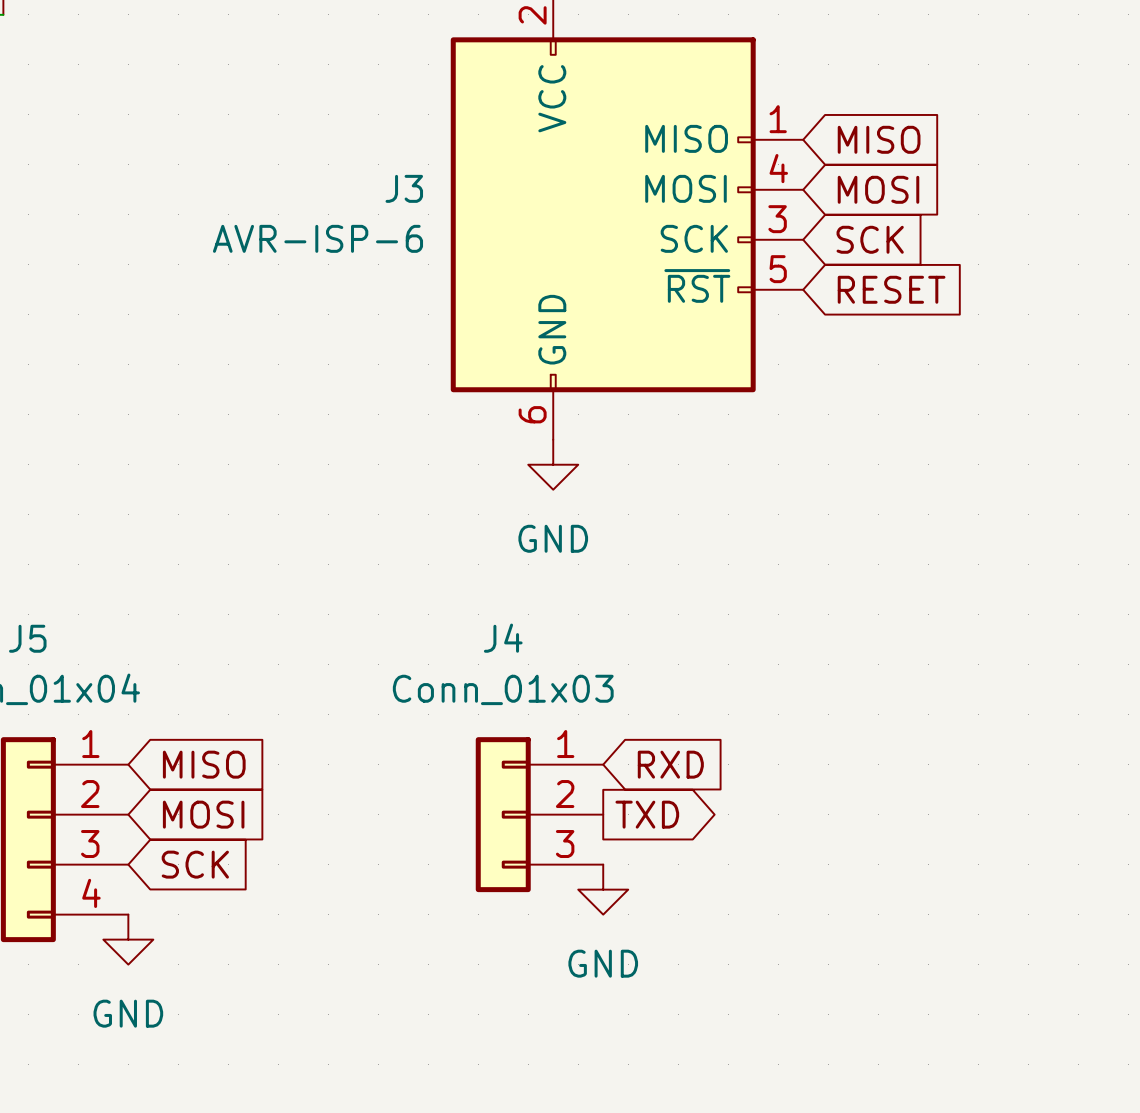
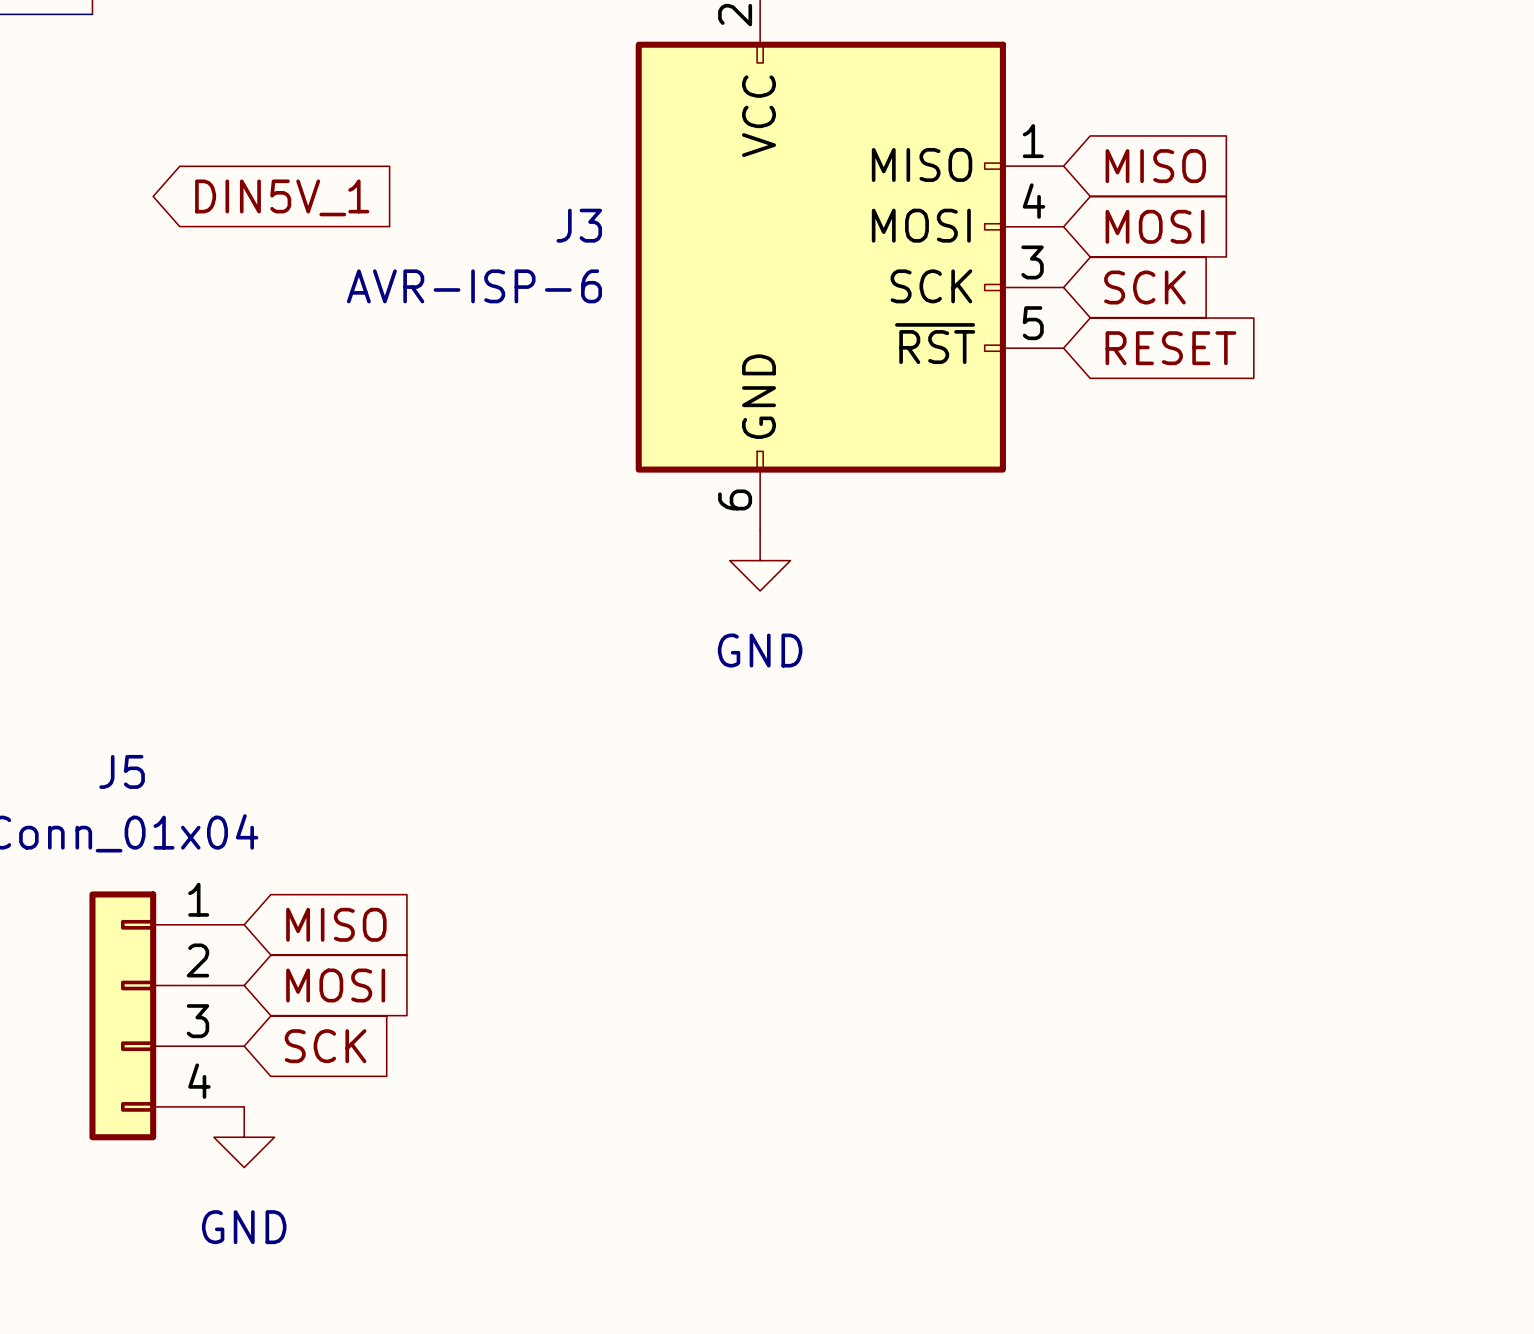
global label: none -> DIN5V_1 (282, 197)
global label: RXD (670, 764) -> none
J4: Conn_01x03 (539, 814) -> none
global label: TXD (647, 814) -> none
power symbol: GND (603, 889) -> none

